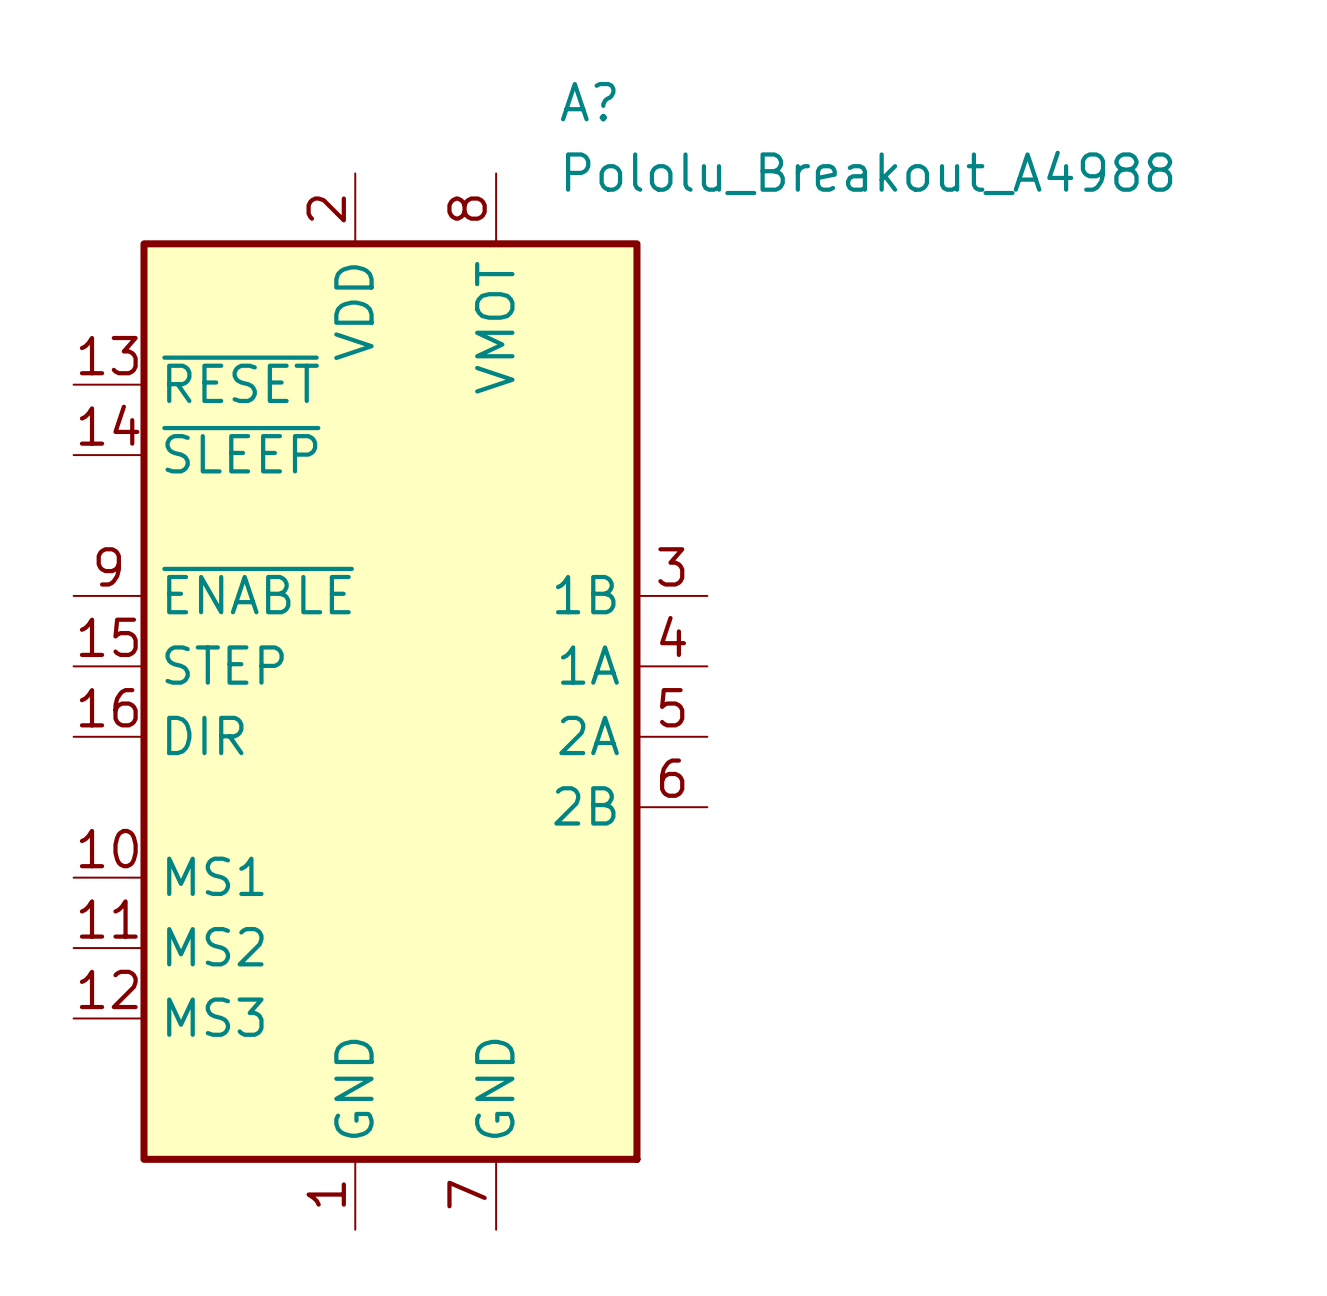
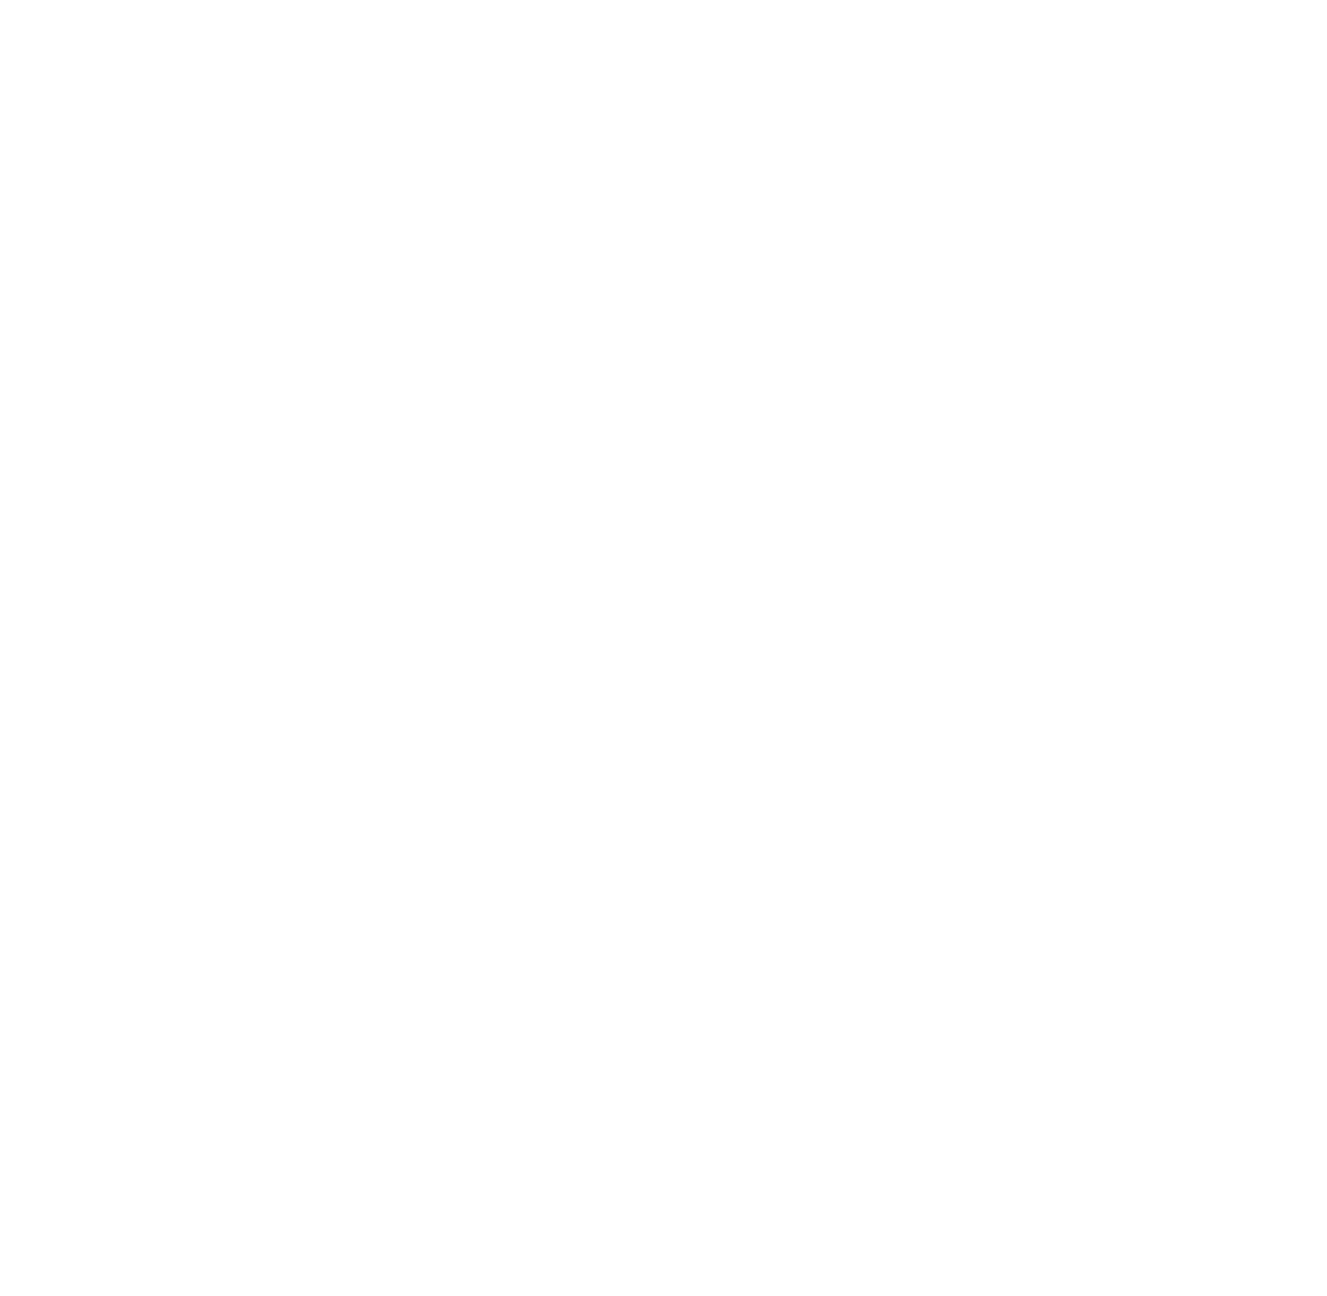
A?: Pololu_Breakout_A4988 (390, 701) -> none

